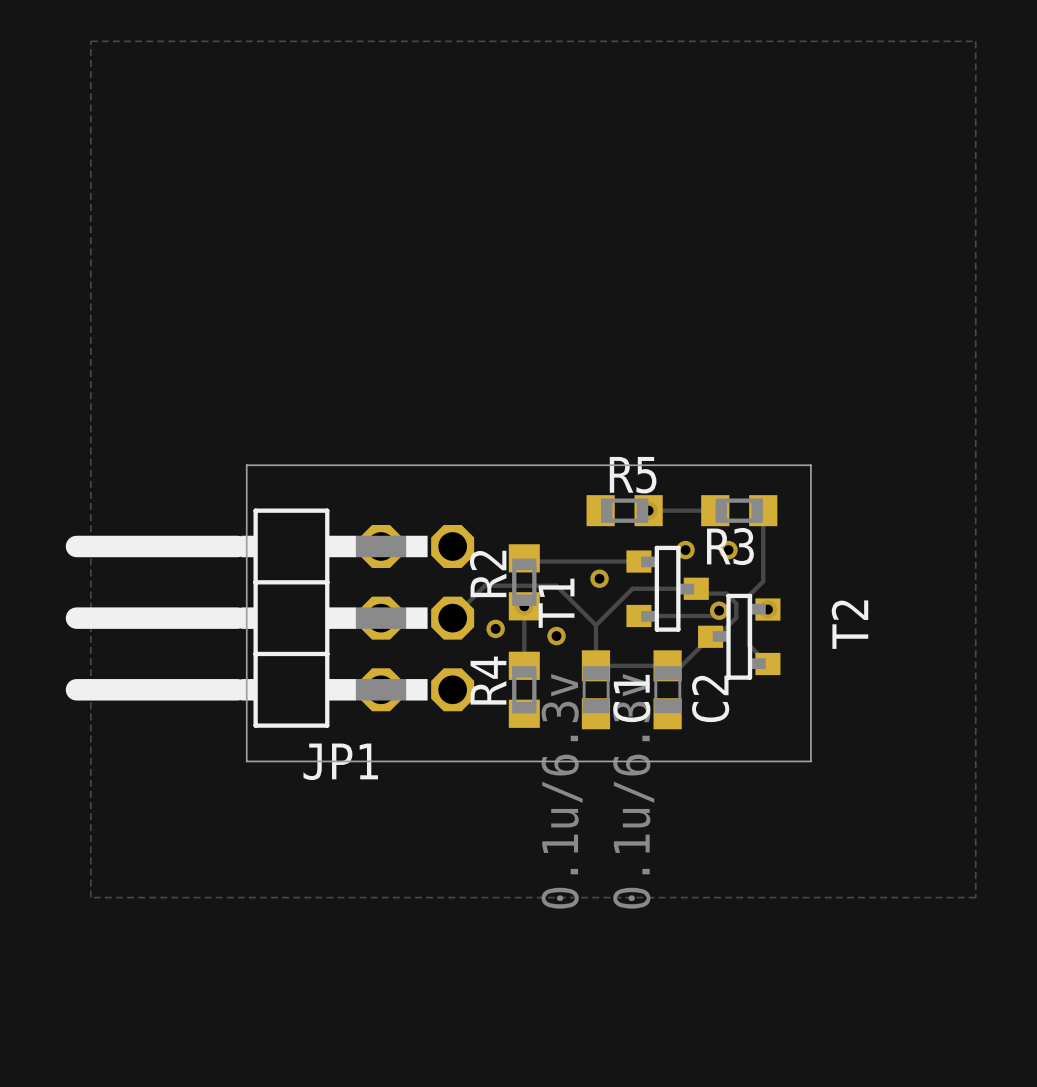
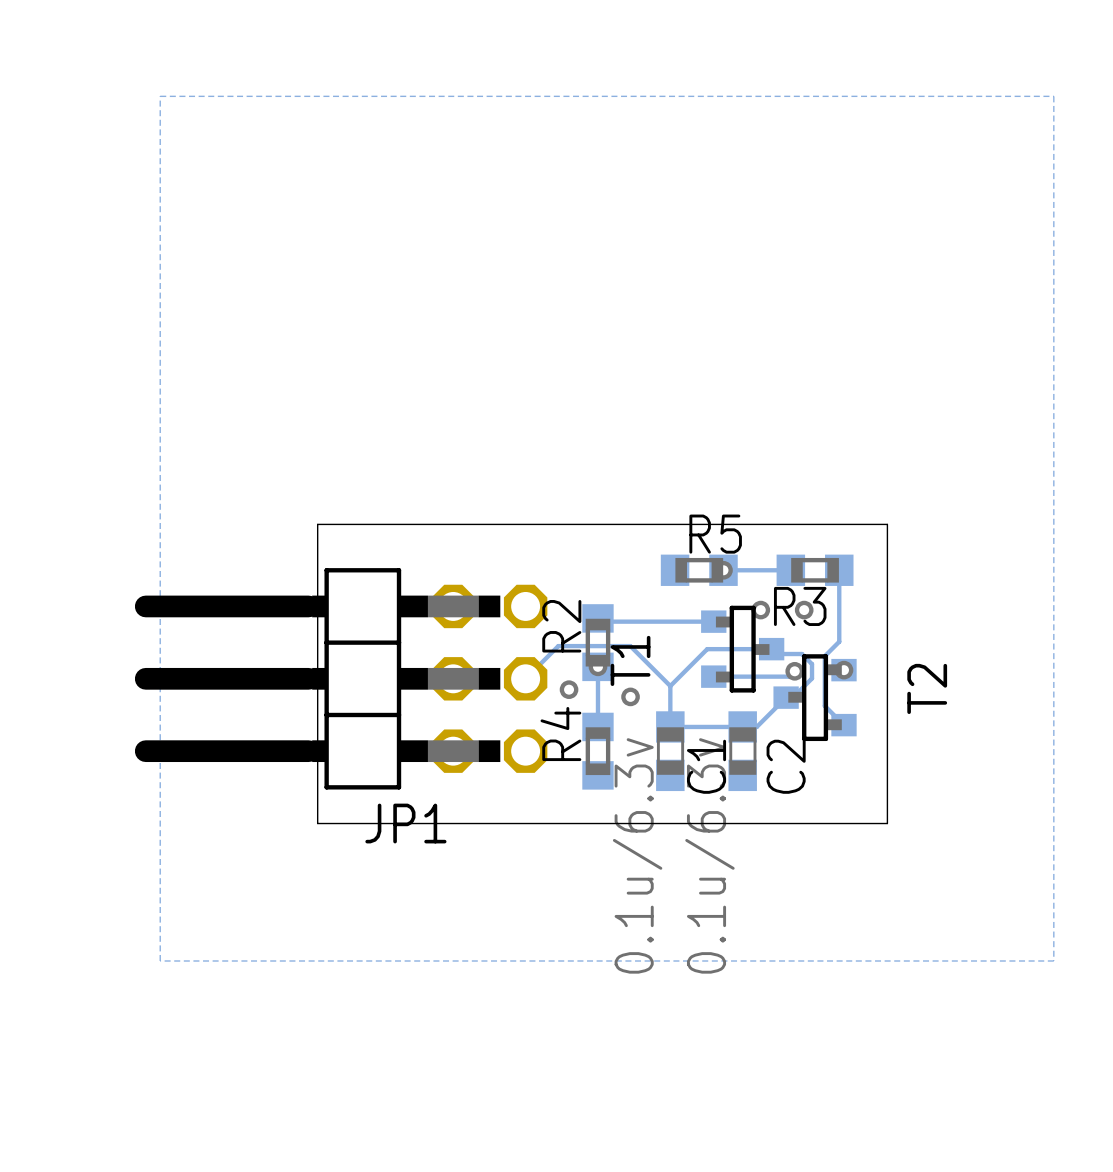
via: (599, 578) -> none

